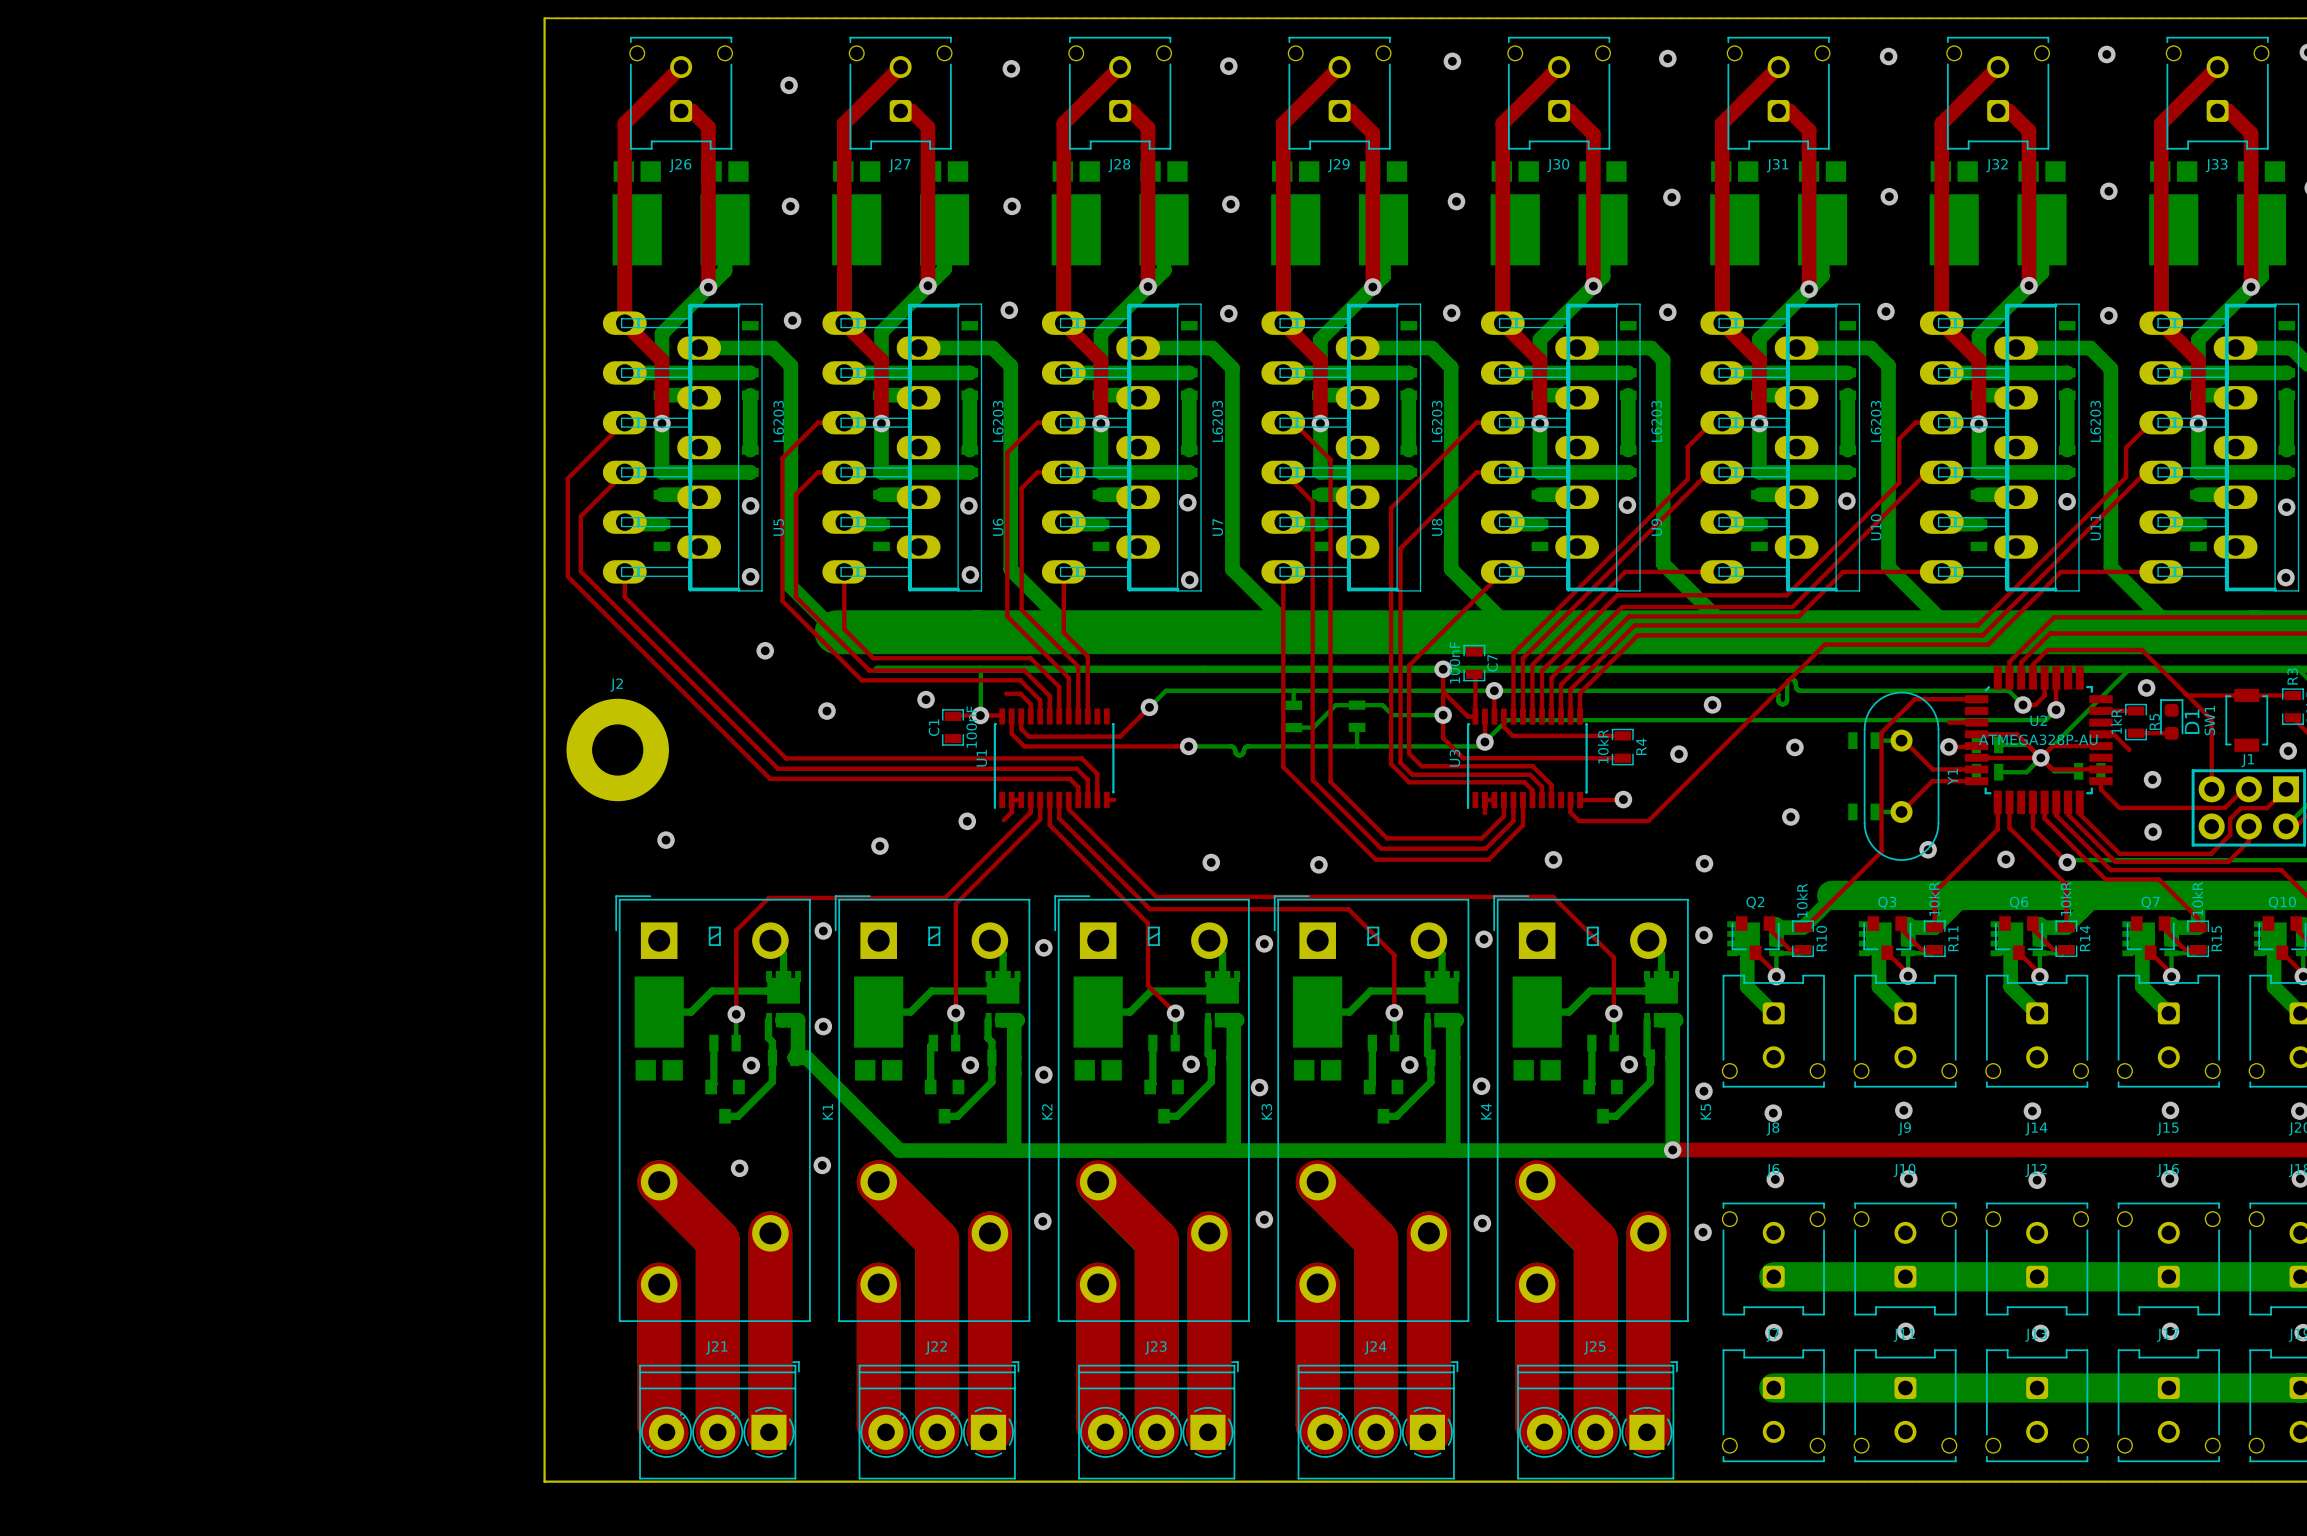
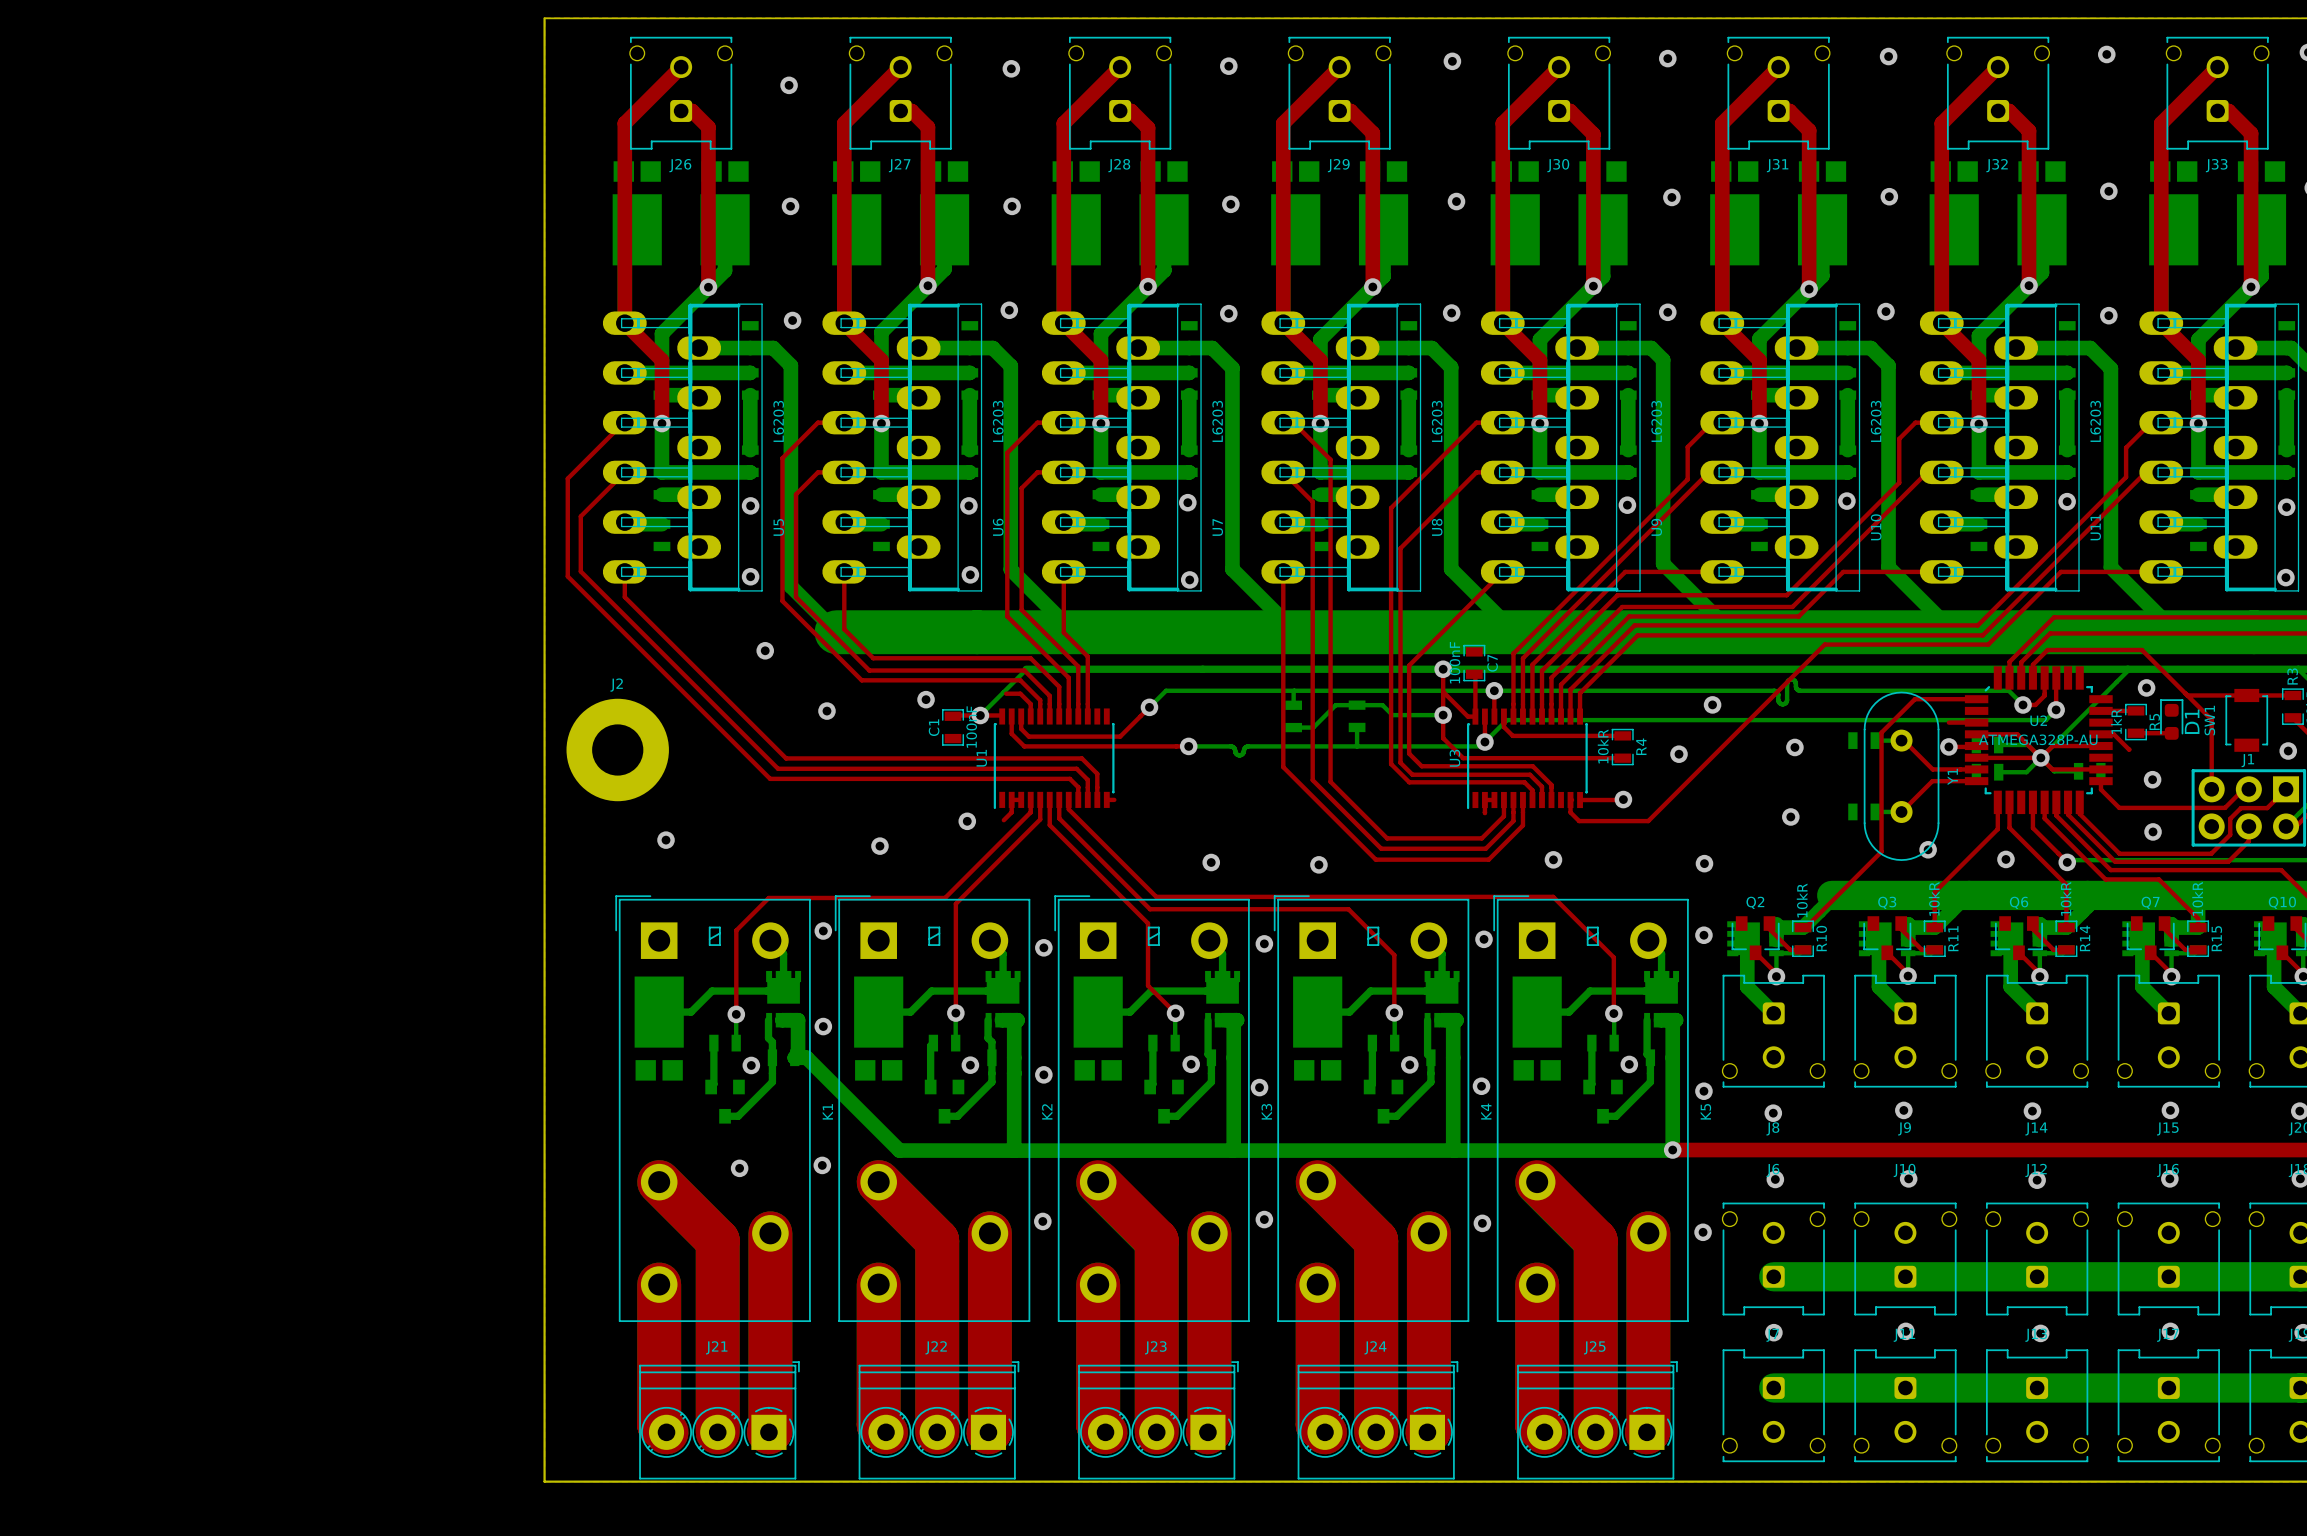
bottom track: (877, 669) (1026, 669) -> none
bottom track: (980, 669) (980, 715) -> (1026, 669) (980, 715)

